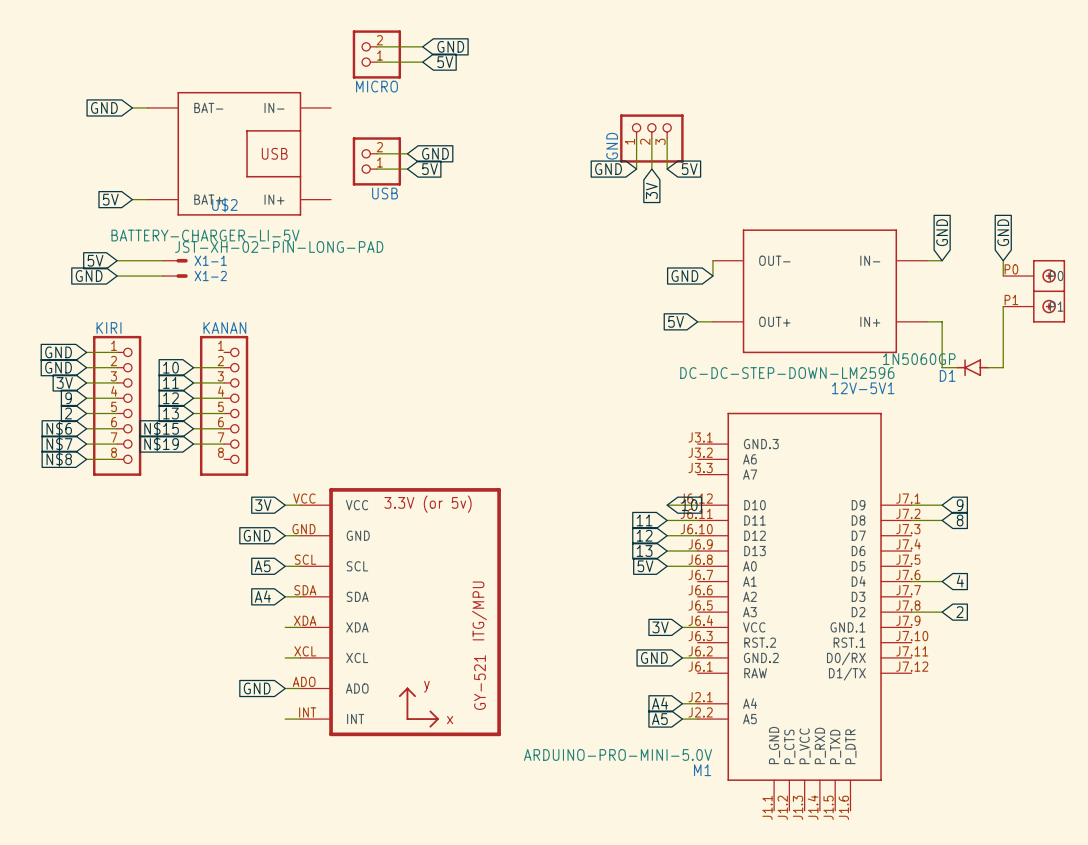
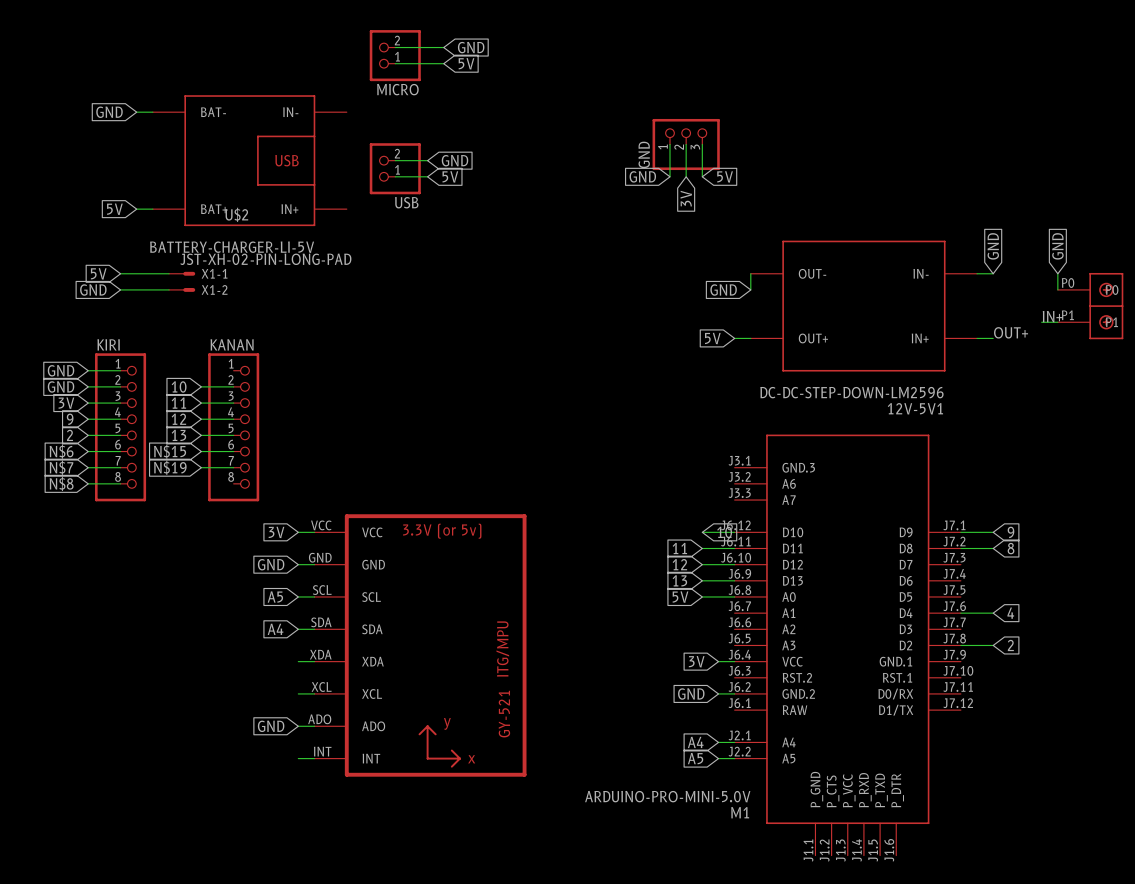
label: none -> IN+ (1052, 316)
wire: (1003, 306) (1003, 367) (987, 367) -> (1057, 322) (1041, 322)
label: none -> OUT+ (1011, 332)
wire: (942, 321) (942, 367) (957, 367) -> none
D1: 1N5060GP (972, 367) -> none

